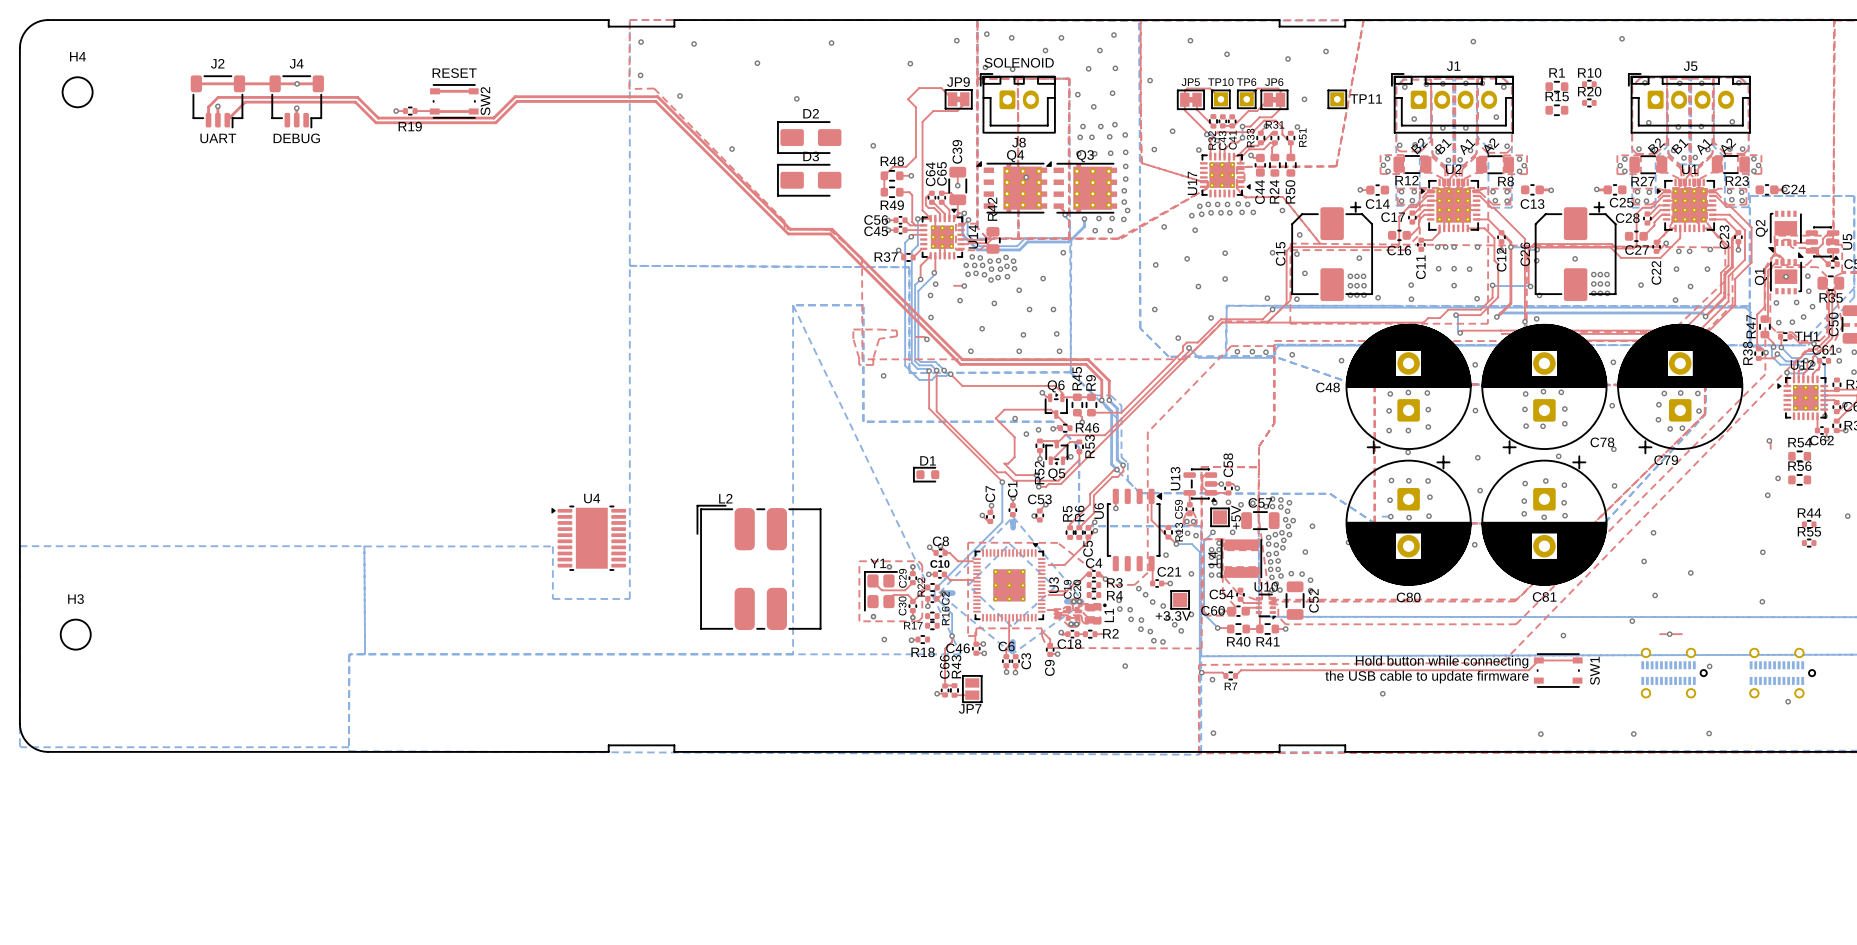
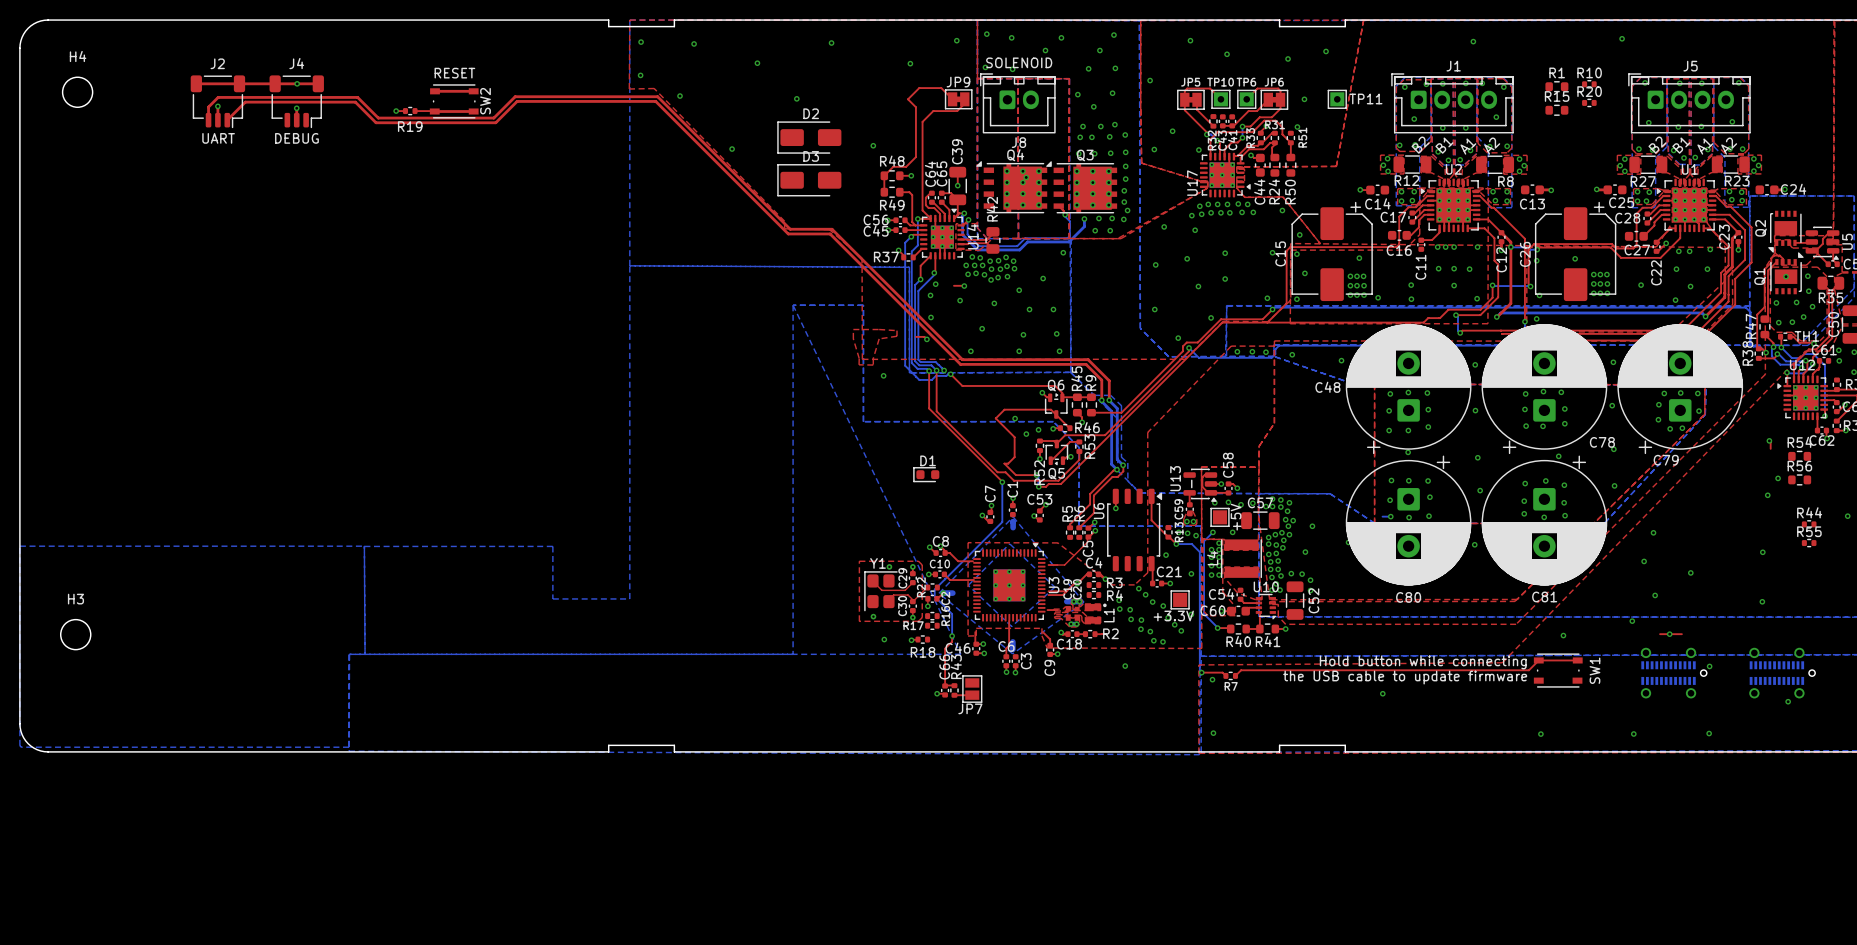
U4: (588, 538) -> none
L2: (759, 567) -> none

